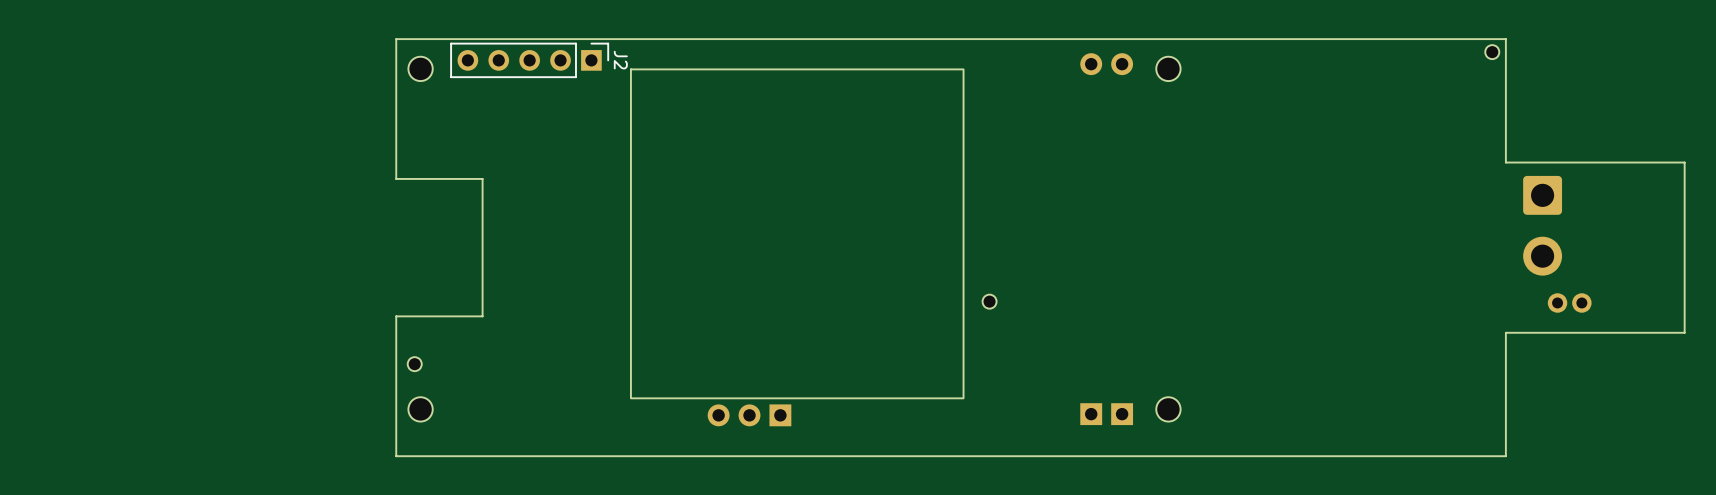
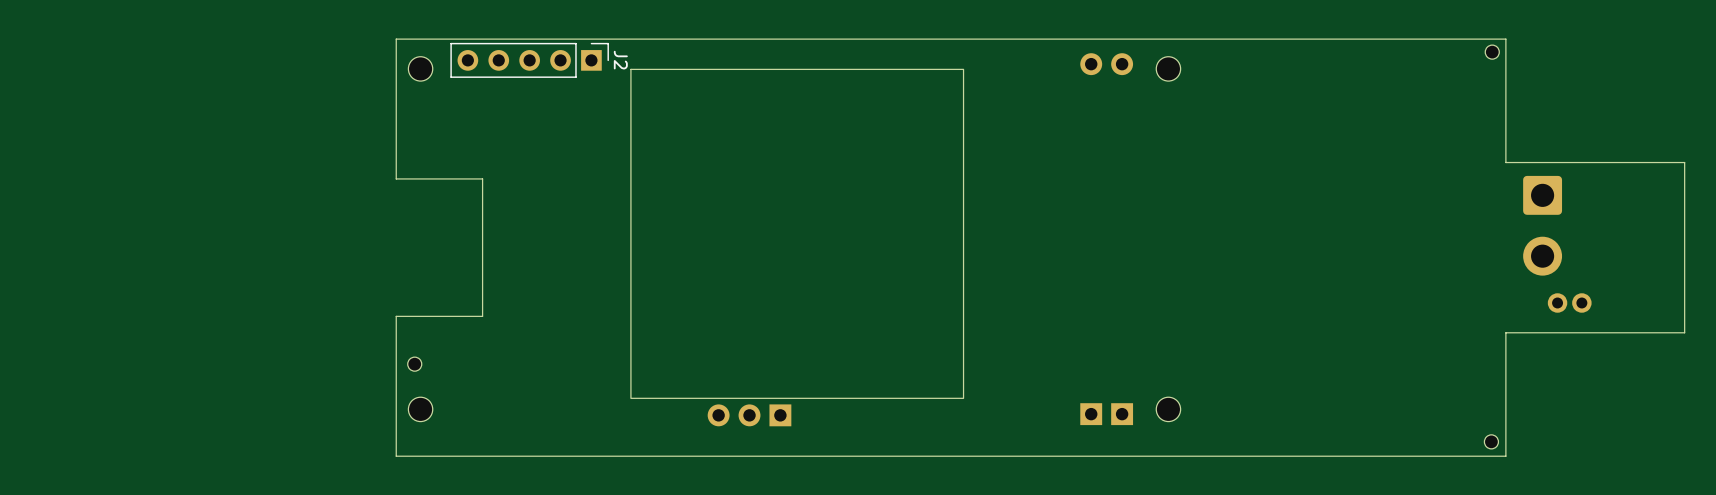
part: (989, 301) -> none
part: none -> (1491, 441)

